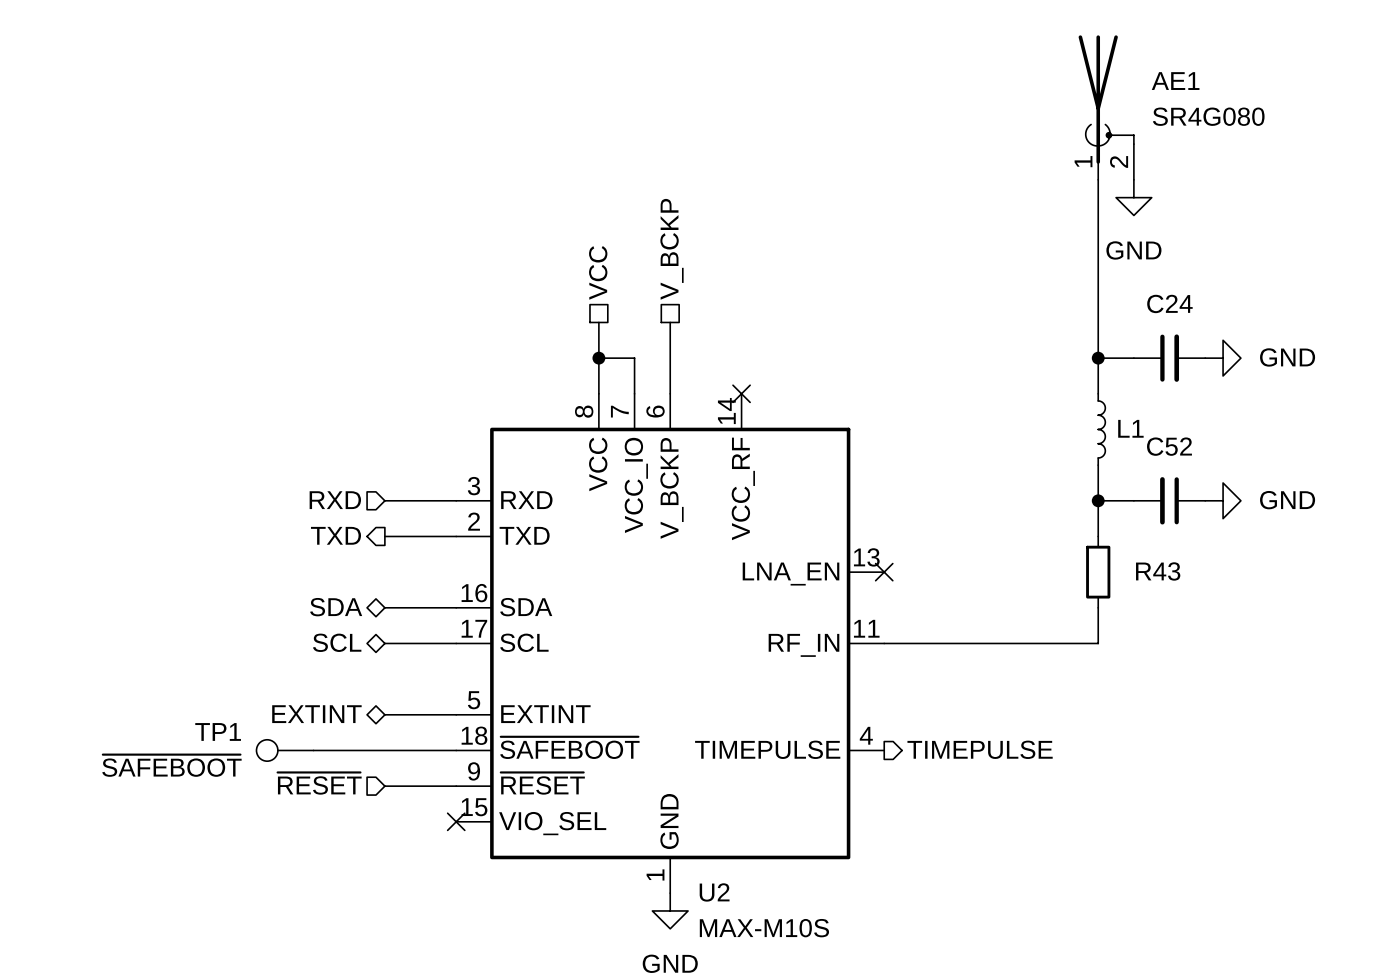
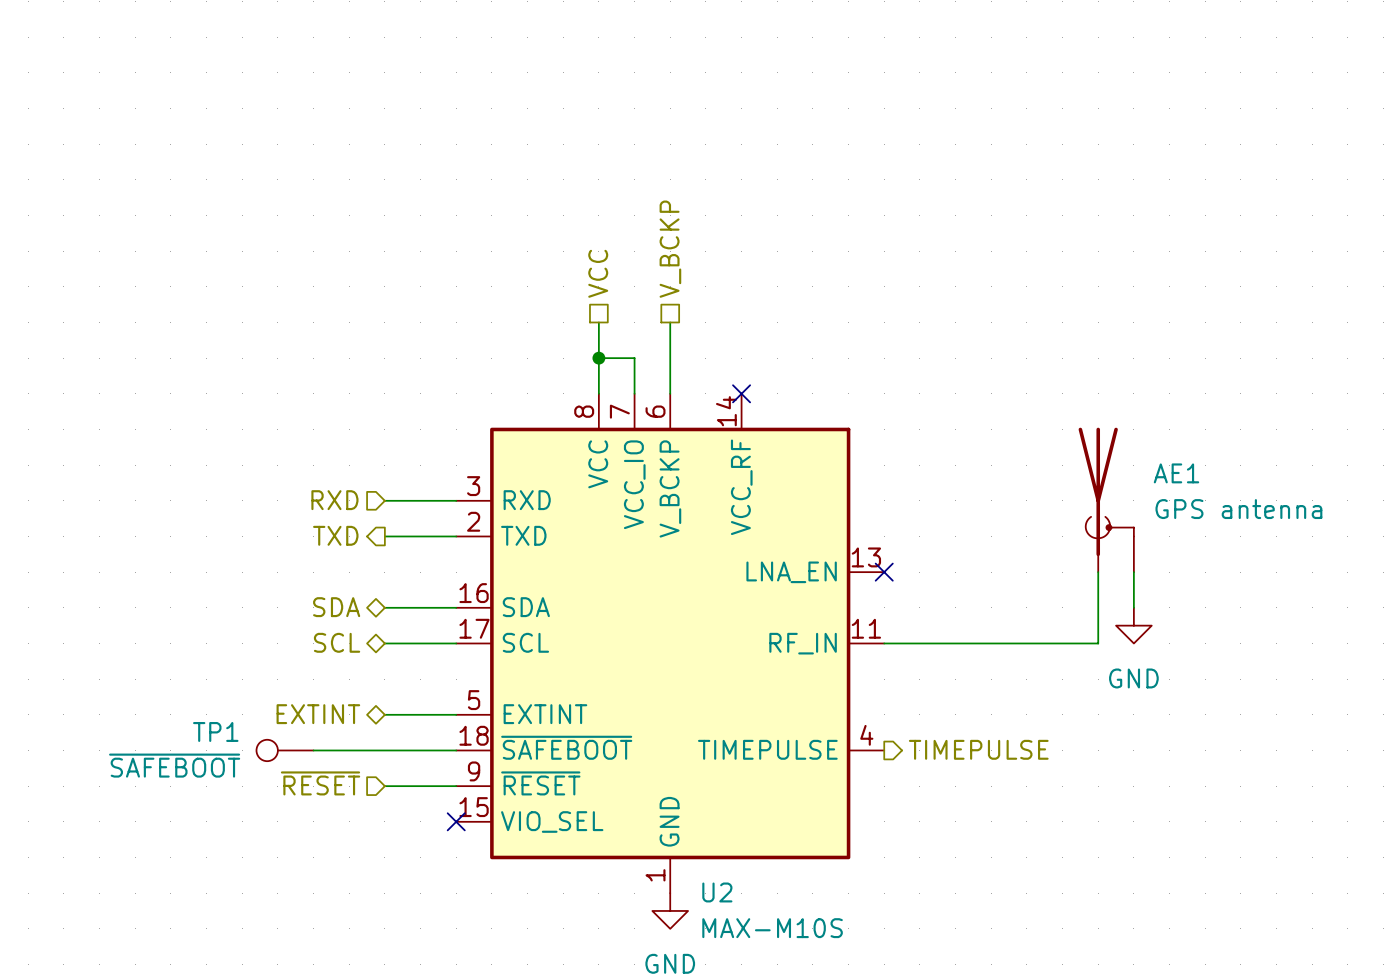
AE1 position: (1106, 107) -> (1106, 499)
AE1 value: SR4G080 (1208, 116) -> GPS antenna (1238, 509)
AE1 pin number: 1 (1083, 161) -> none
AE1 pin number: 2 (1119, 161) -> none
wire: (1098, 179) (1098, 393) -> none
power symbol: GND (1133, 197) -> none
wire: (1098, 358) (1133, 358) -> none
junction: (1098, 358) -> none
C24: (1169, 358) -> none
power symbol: GND (1223, 358) -> none
L1: (1101, 429) -> none
wire: (1098, 500) (1133, 500) -> none
junction: (1098, 500) -> none
C52: (1169, 500) -> none
power symbol: GND (1223, 500) -> none
wire: none -> (1098, 572) (1098, 607)
R43: (1098, 572) -> none
wire: none -> (1133, 572) (1133, 607)
power symbol: none -> GND (1133, 625)

